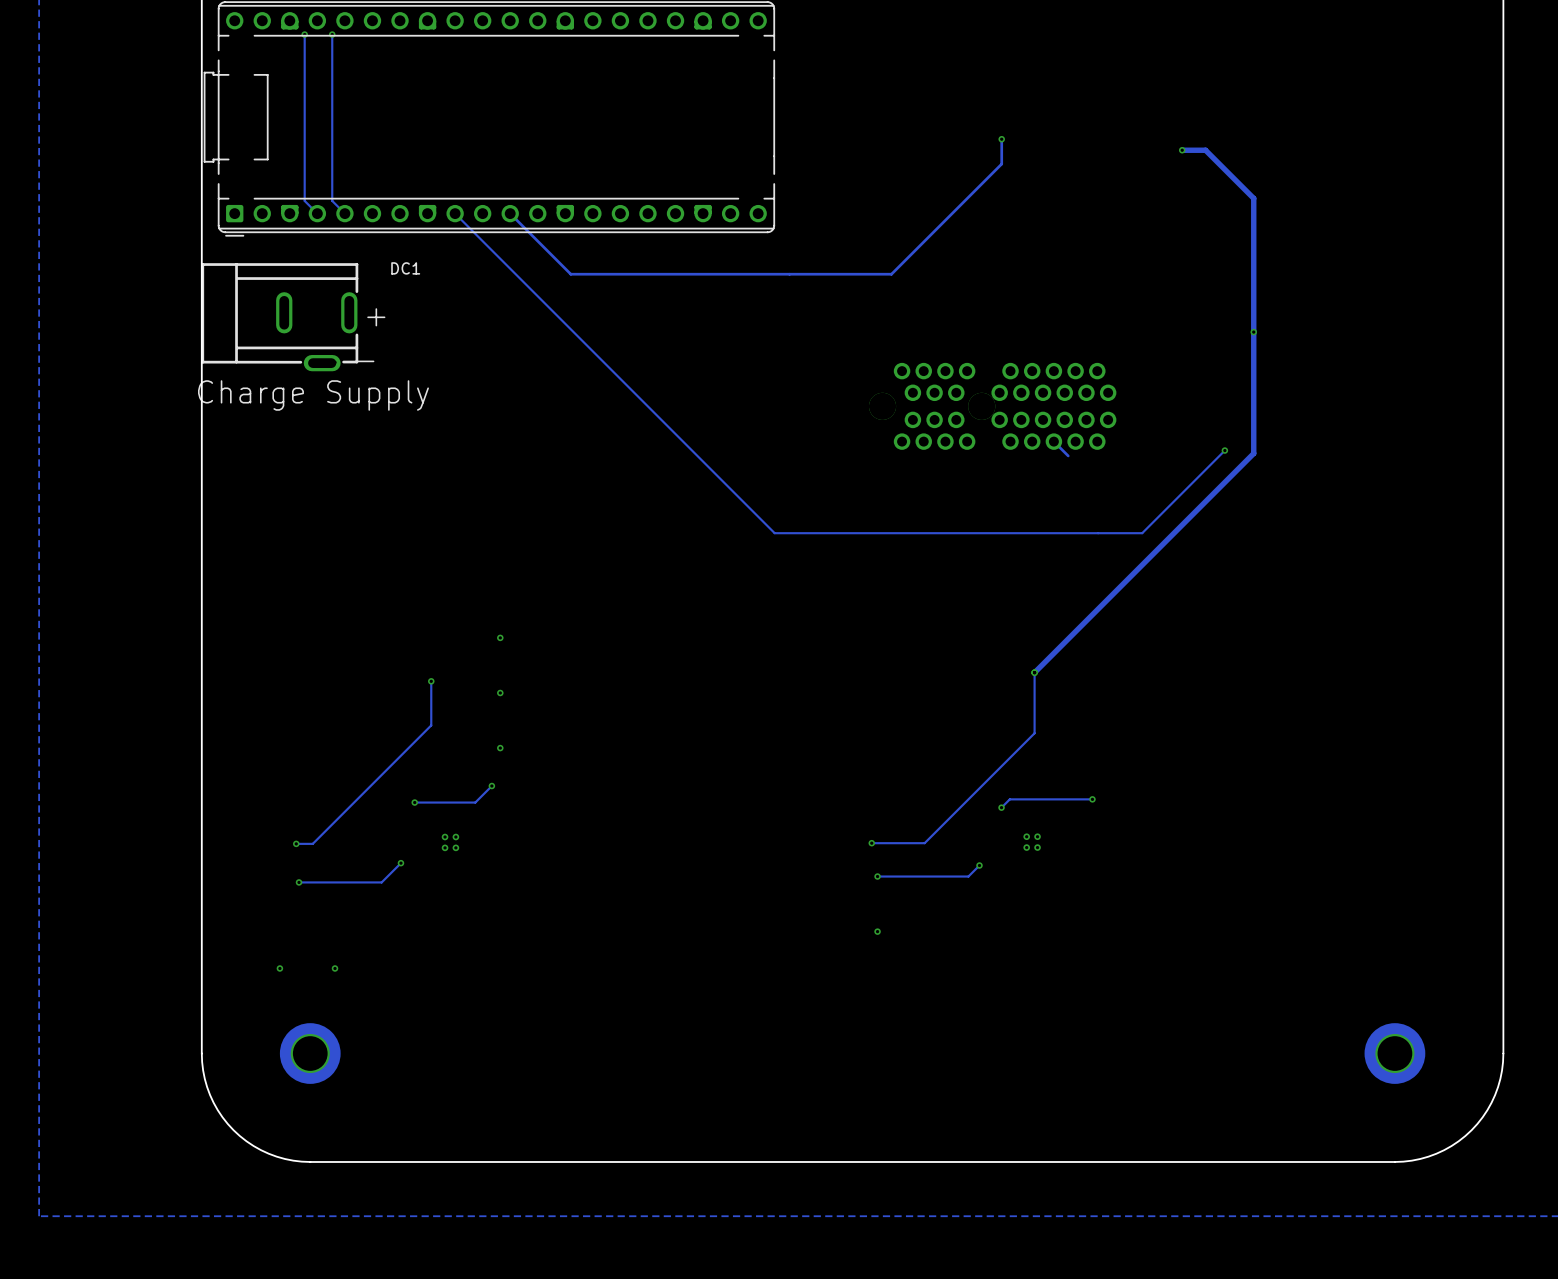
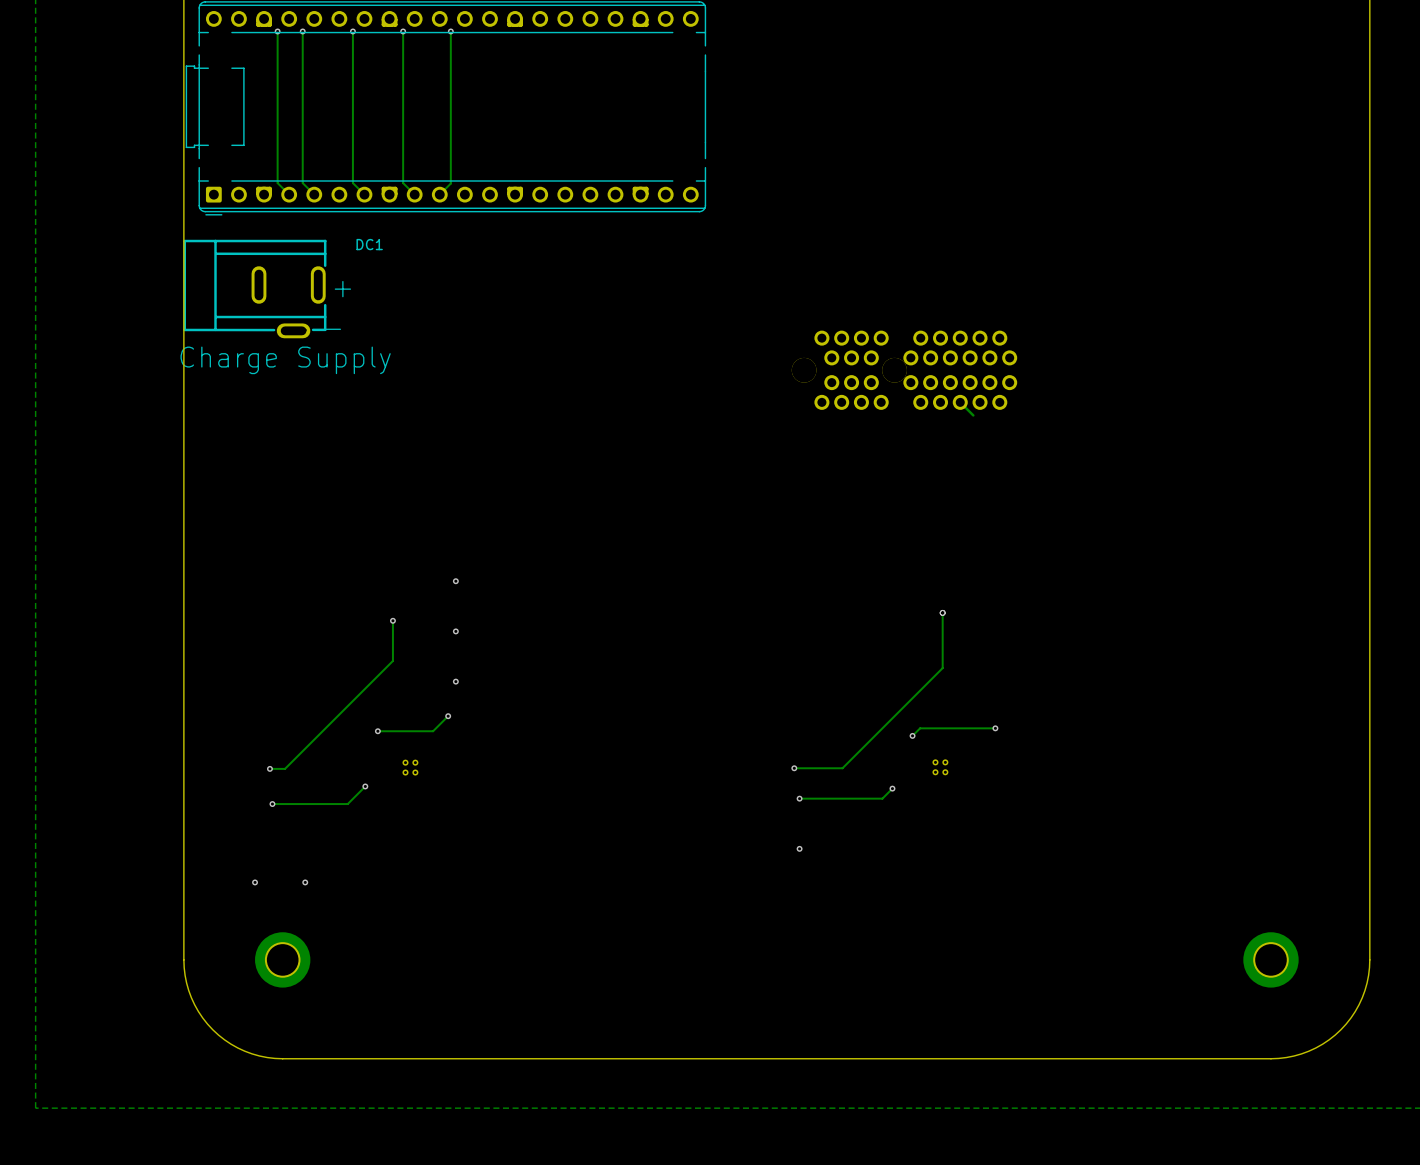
track: none -> (352, 31) (352, 183) (364, 194)
via: none -> (352, 31)
via: none -> (403, 31)
track: none -> (450, 31) (450, 183) (439, 194)
via: none -> (450, 31)
track: (1001, 139) (1001, 164) (891, 274) (570, 274) (510, 213) -> none
via: (1001, 139) -> none
track: (1182, 150) (1205, 150) (1253, 198) (1253, 453) (1034, 672) -> none
via: (1182, 150) -> none
track: (455, 213) (774, 533) (1142, 533) (1224, 450) -> (414, 194) (403, 183) (403, 31)
via: (1253, 332) -> none
via: (1224, 450) -> none

